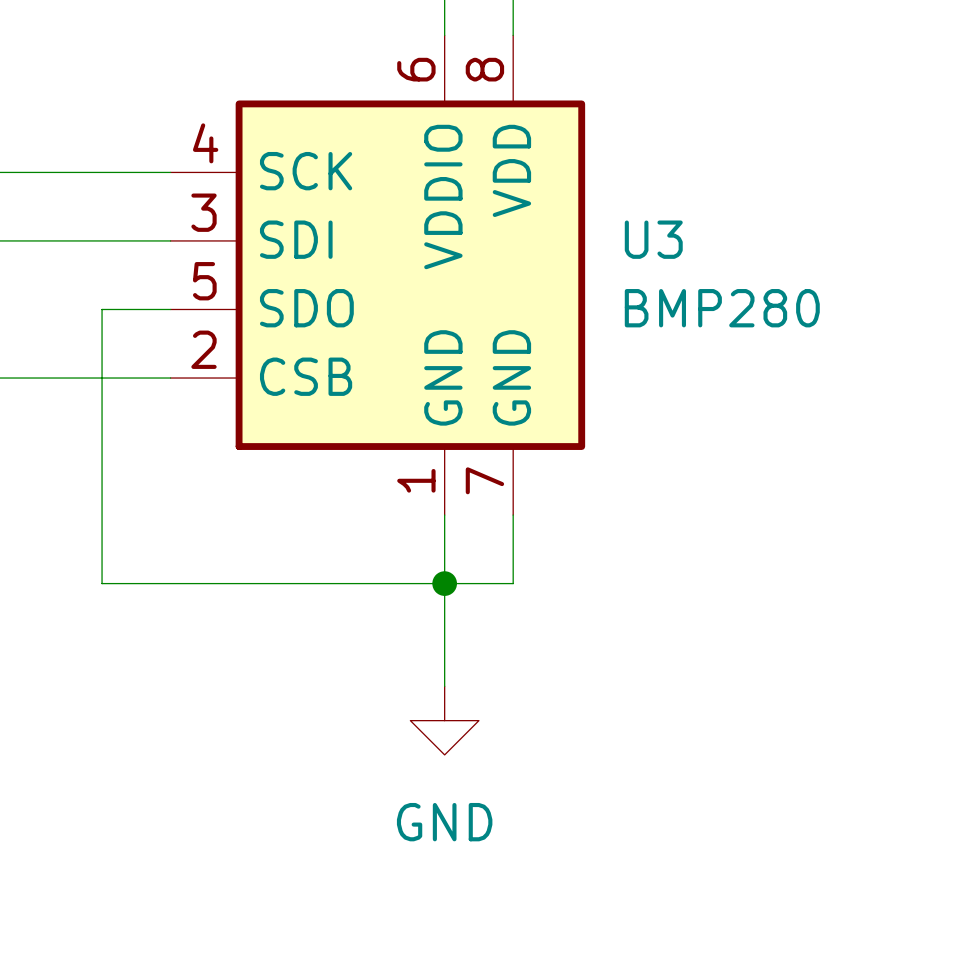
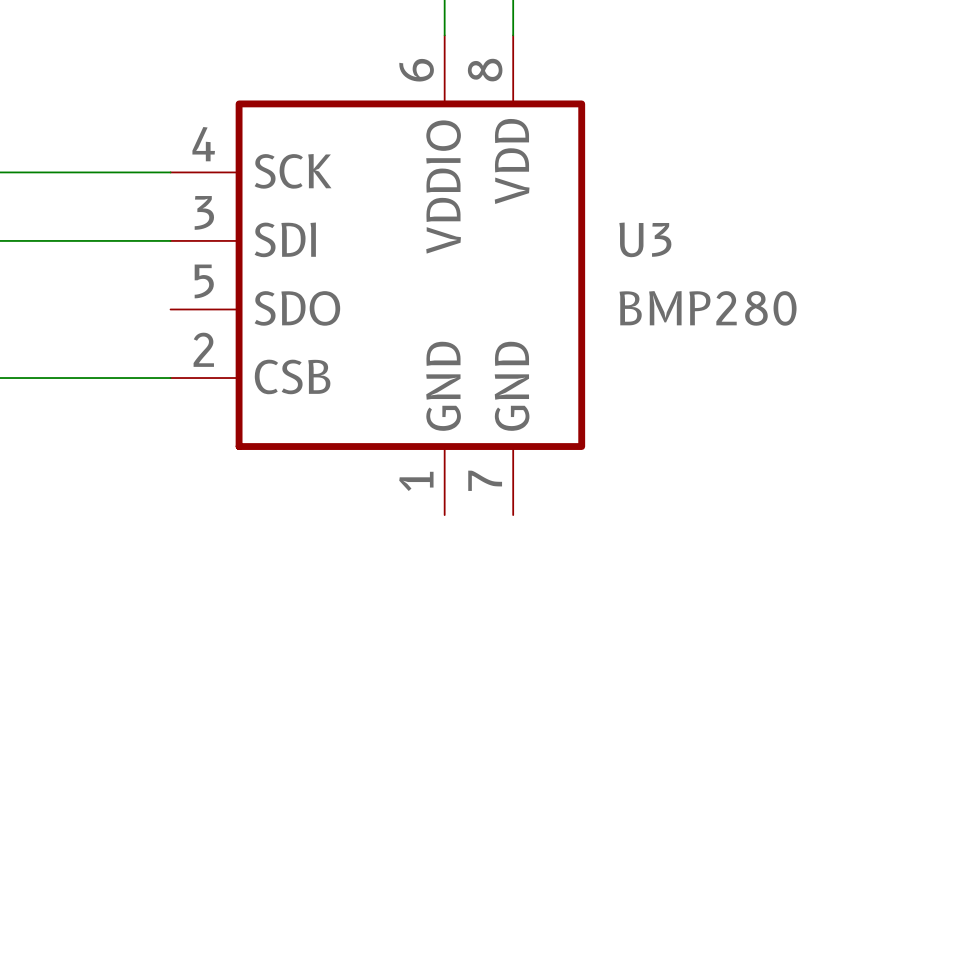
wire: (170, 309) (102, 309) (102, 583) (513, 583) (513, 515) -> none
wire: (444, 515) (444, 686) -> none
junction: (444, 583) -> none
power symbol: GND (444, 720) -> none

